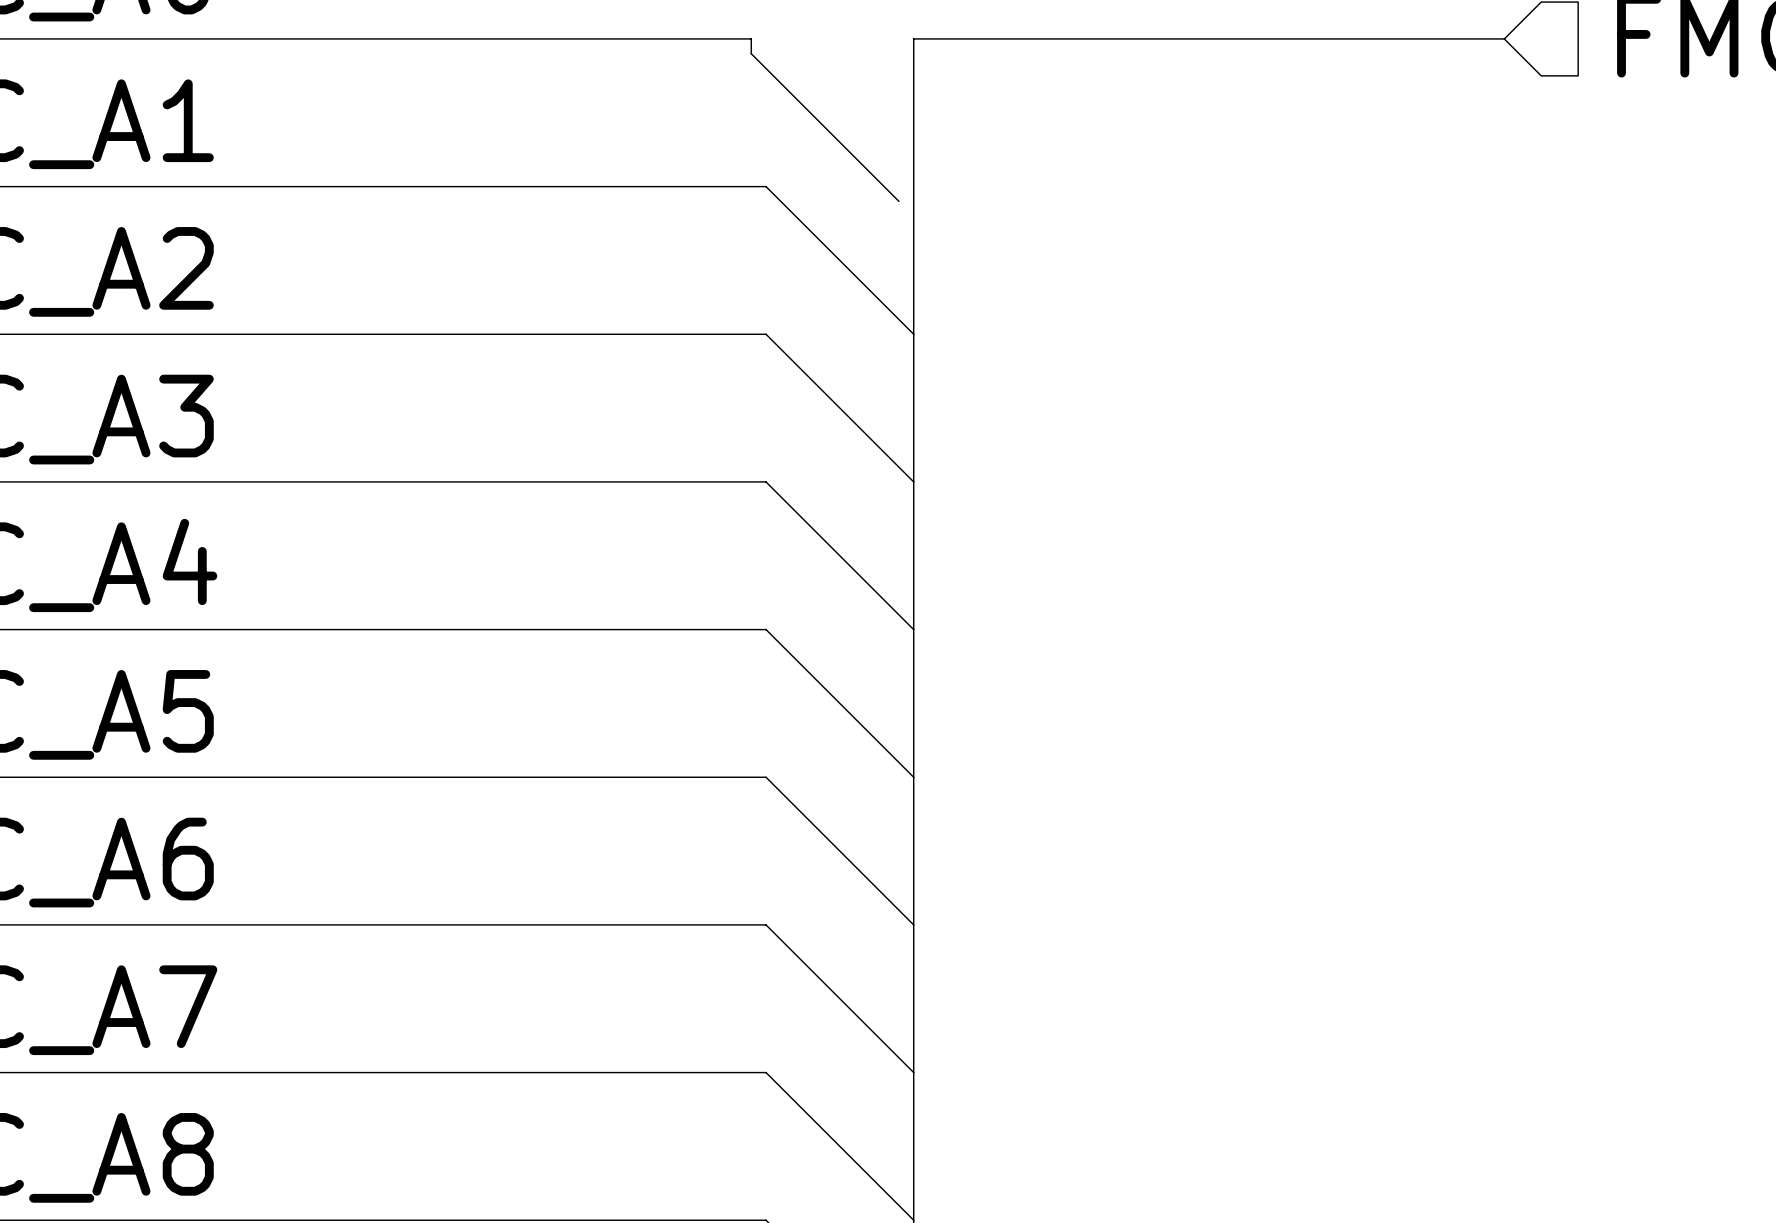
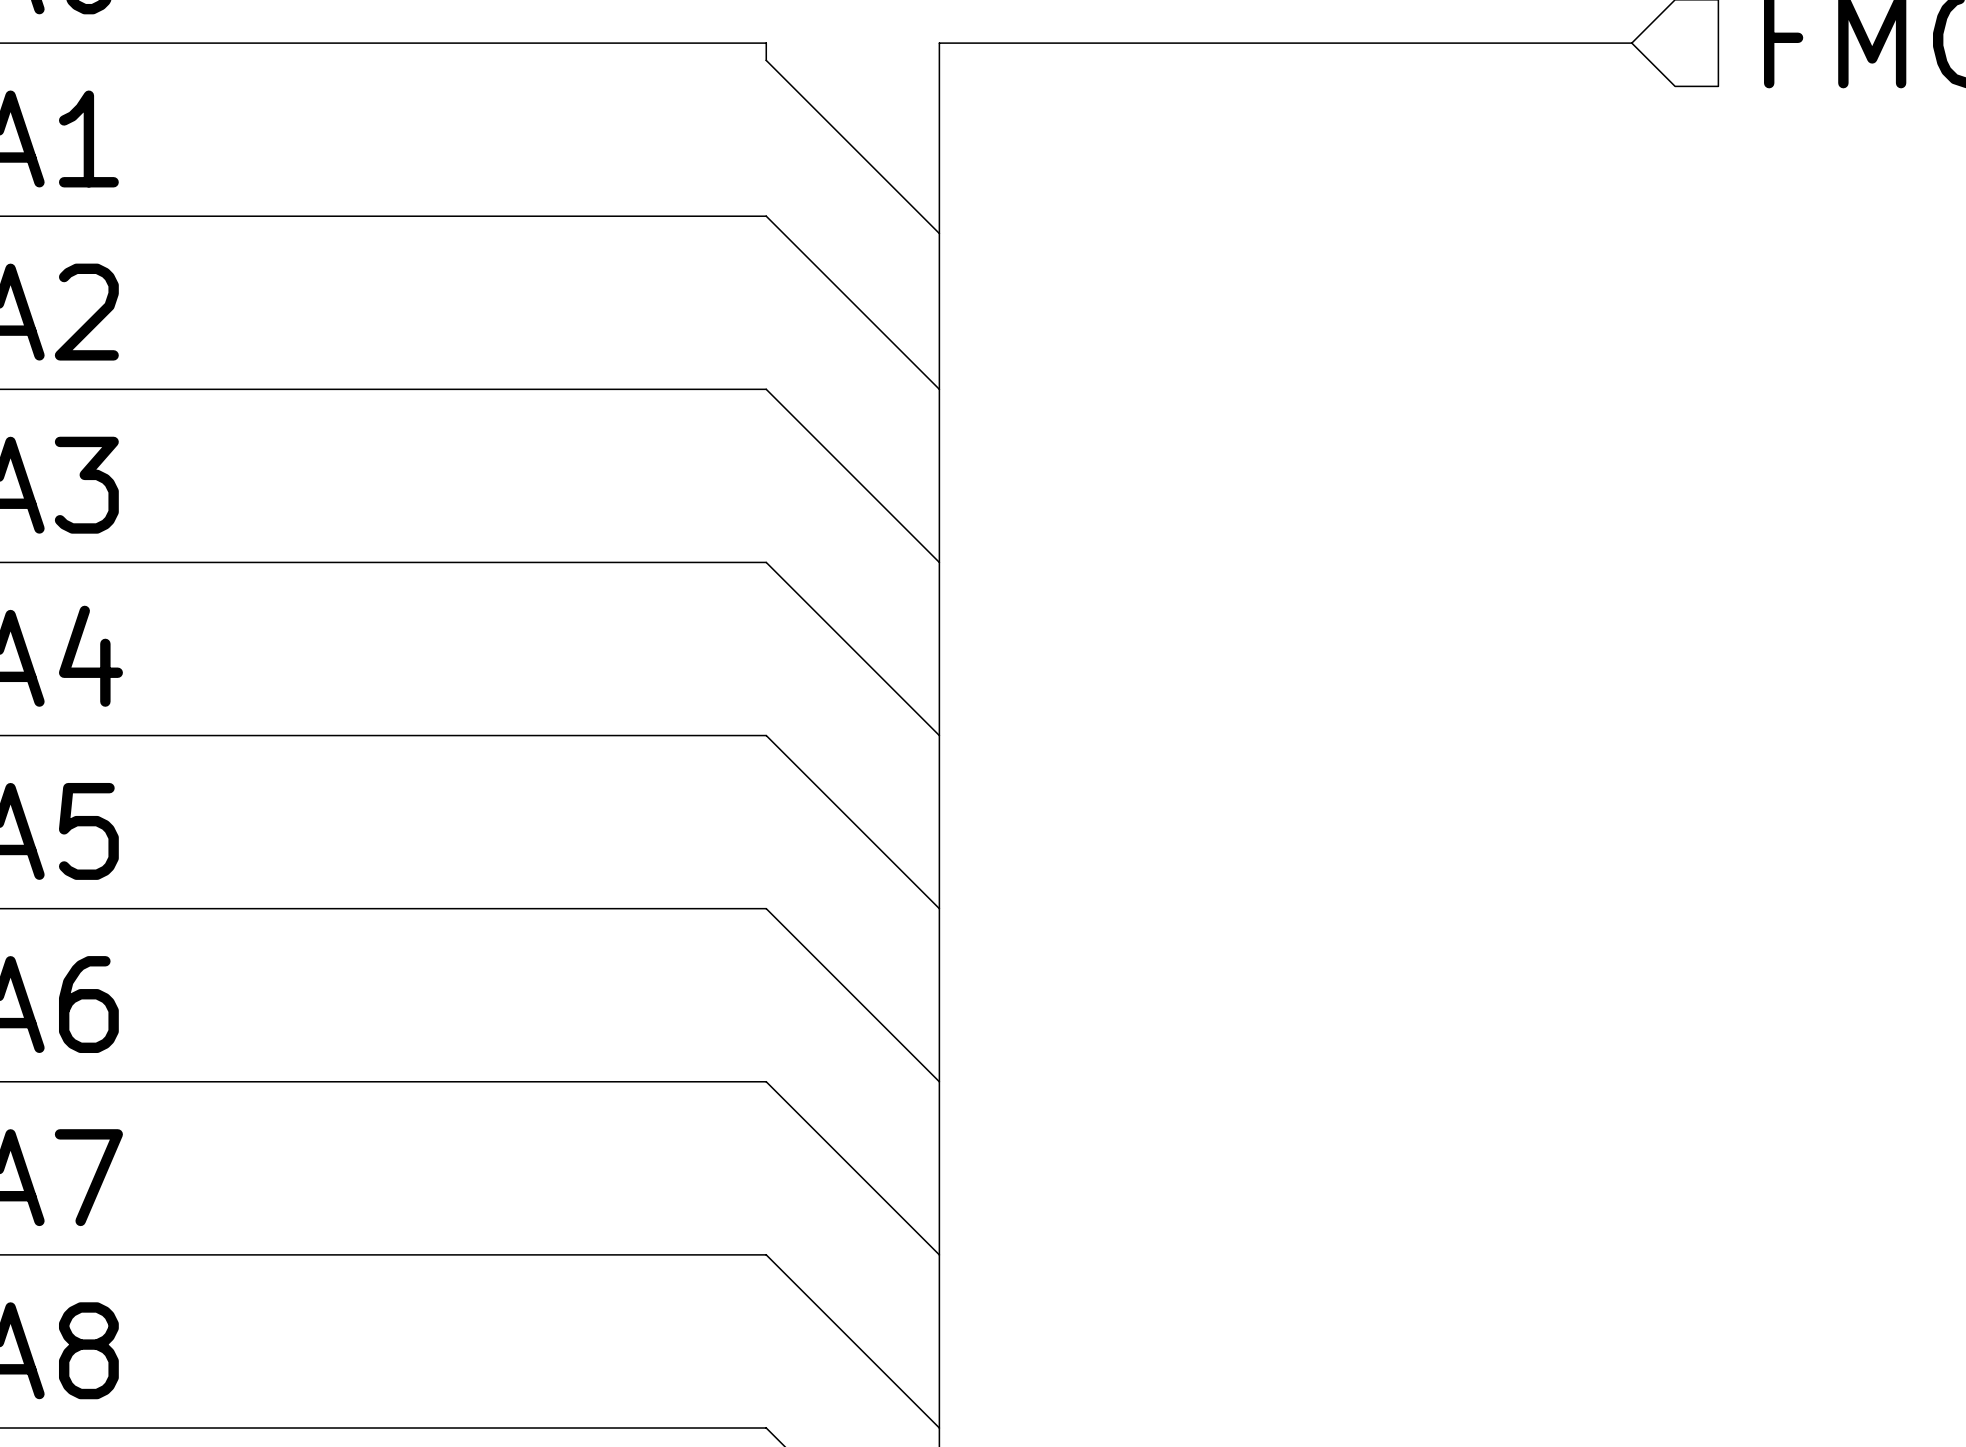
wire: (751, 38) (751, 53) (898, 201) -> (748, 43) (766, 43) (766, 60) (939, 233)

